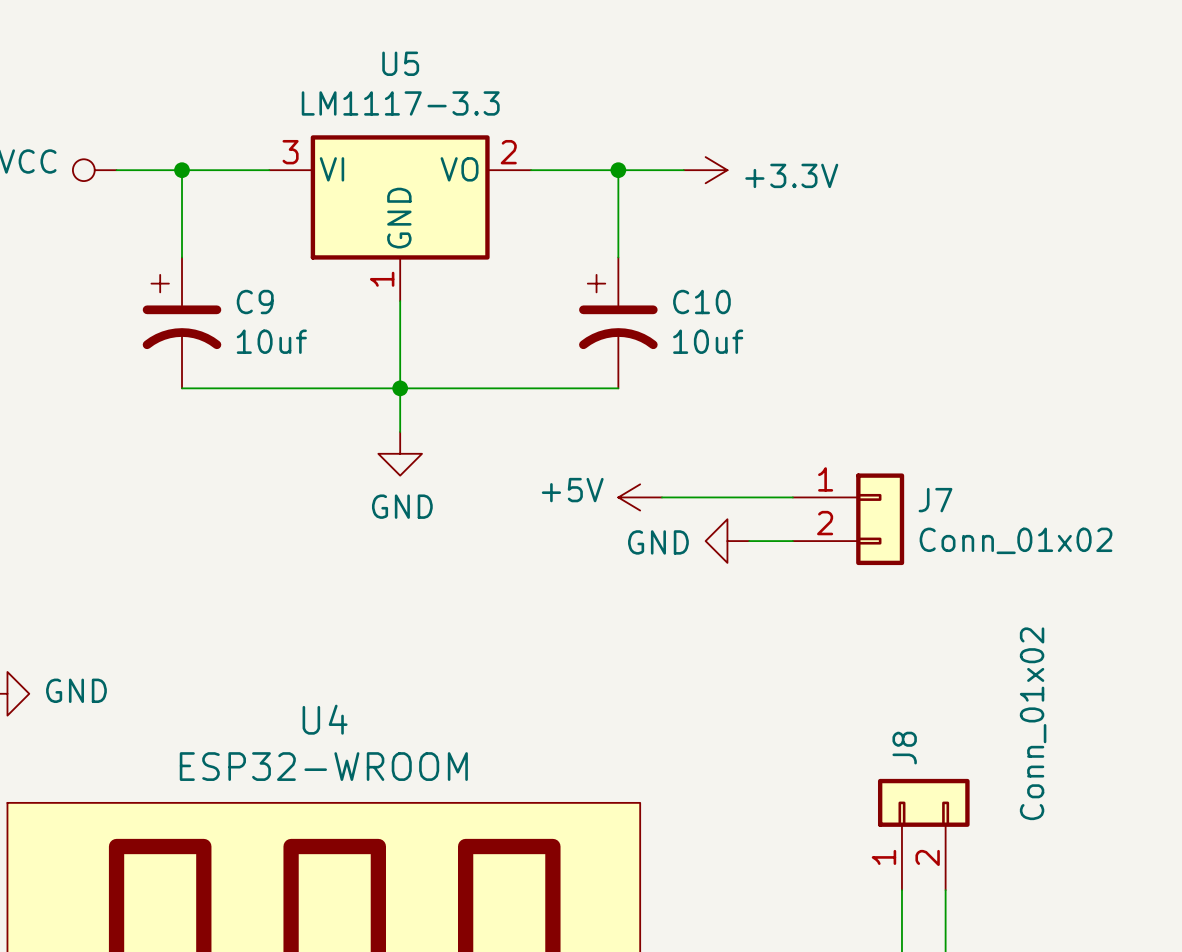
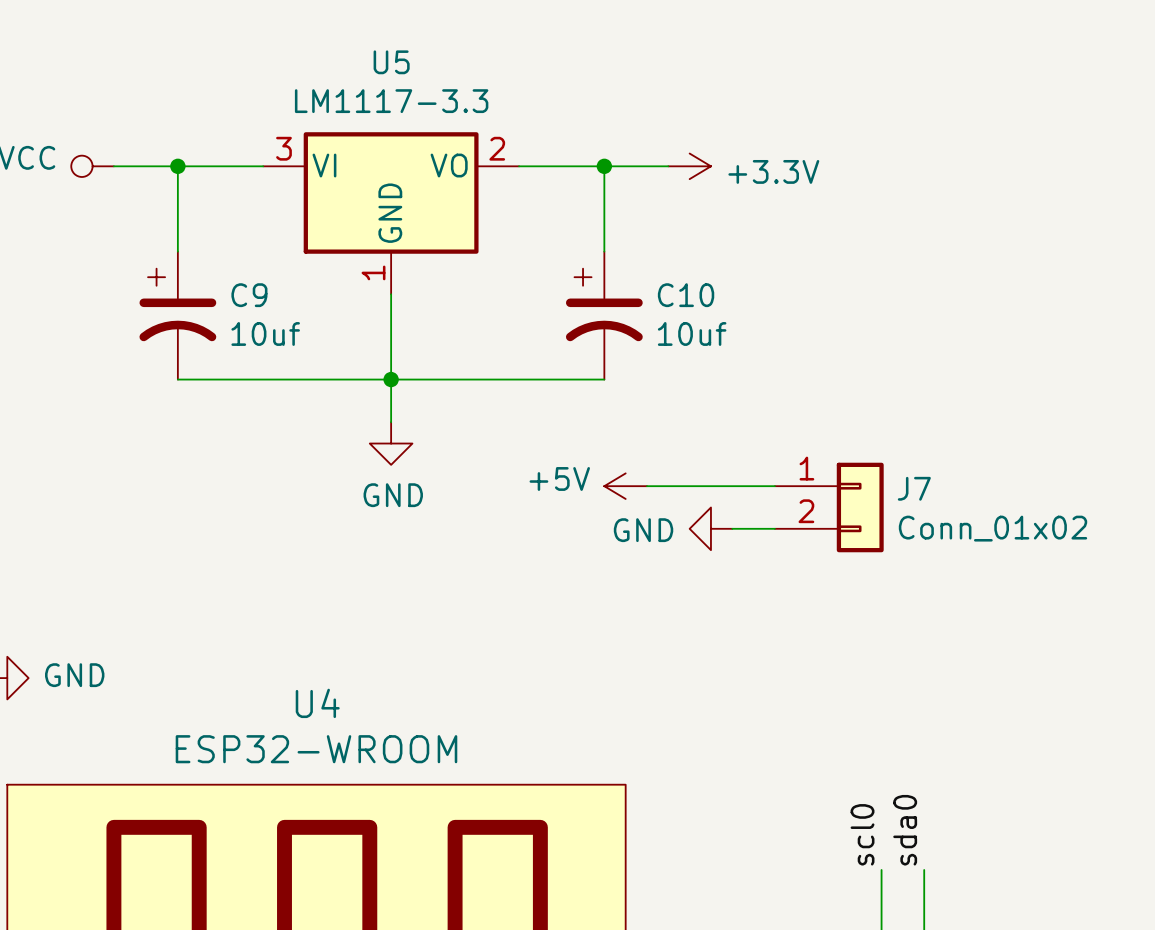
J8: Conn_01x02 (923, 834) -> none
label: none -> sda0 (905, 830)
label: none -> scl0 (862, 834)

